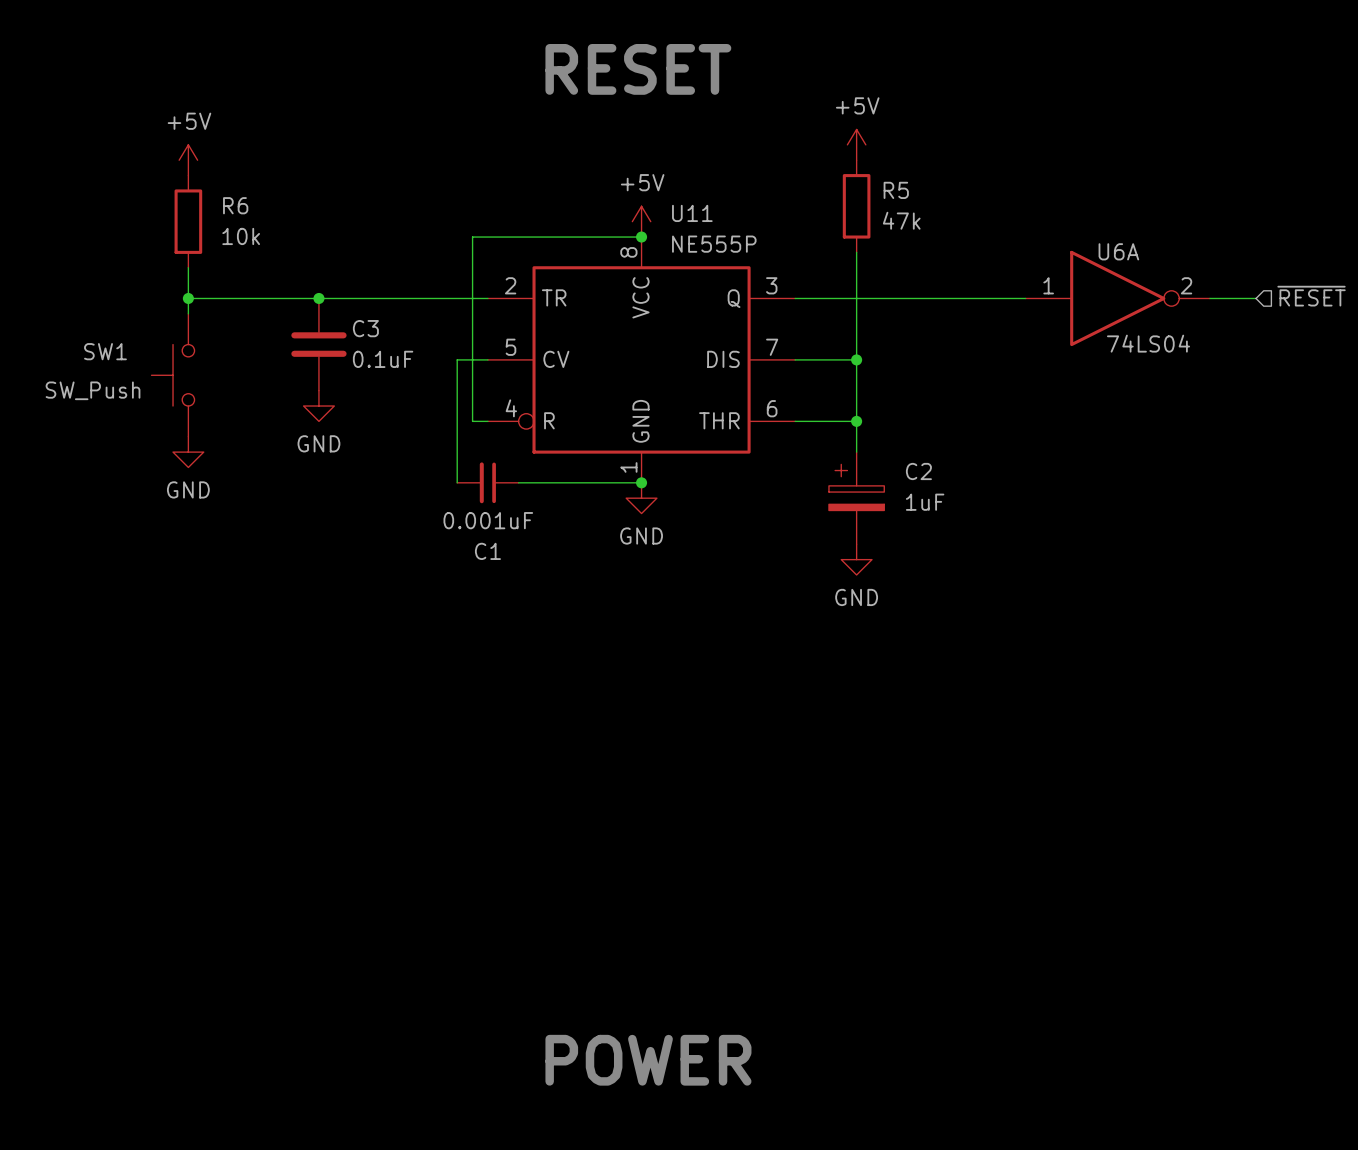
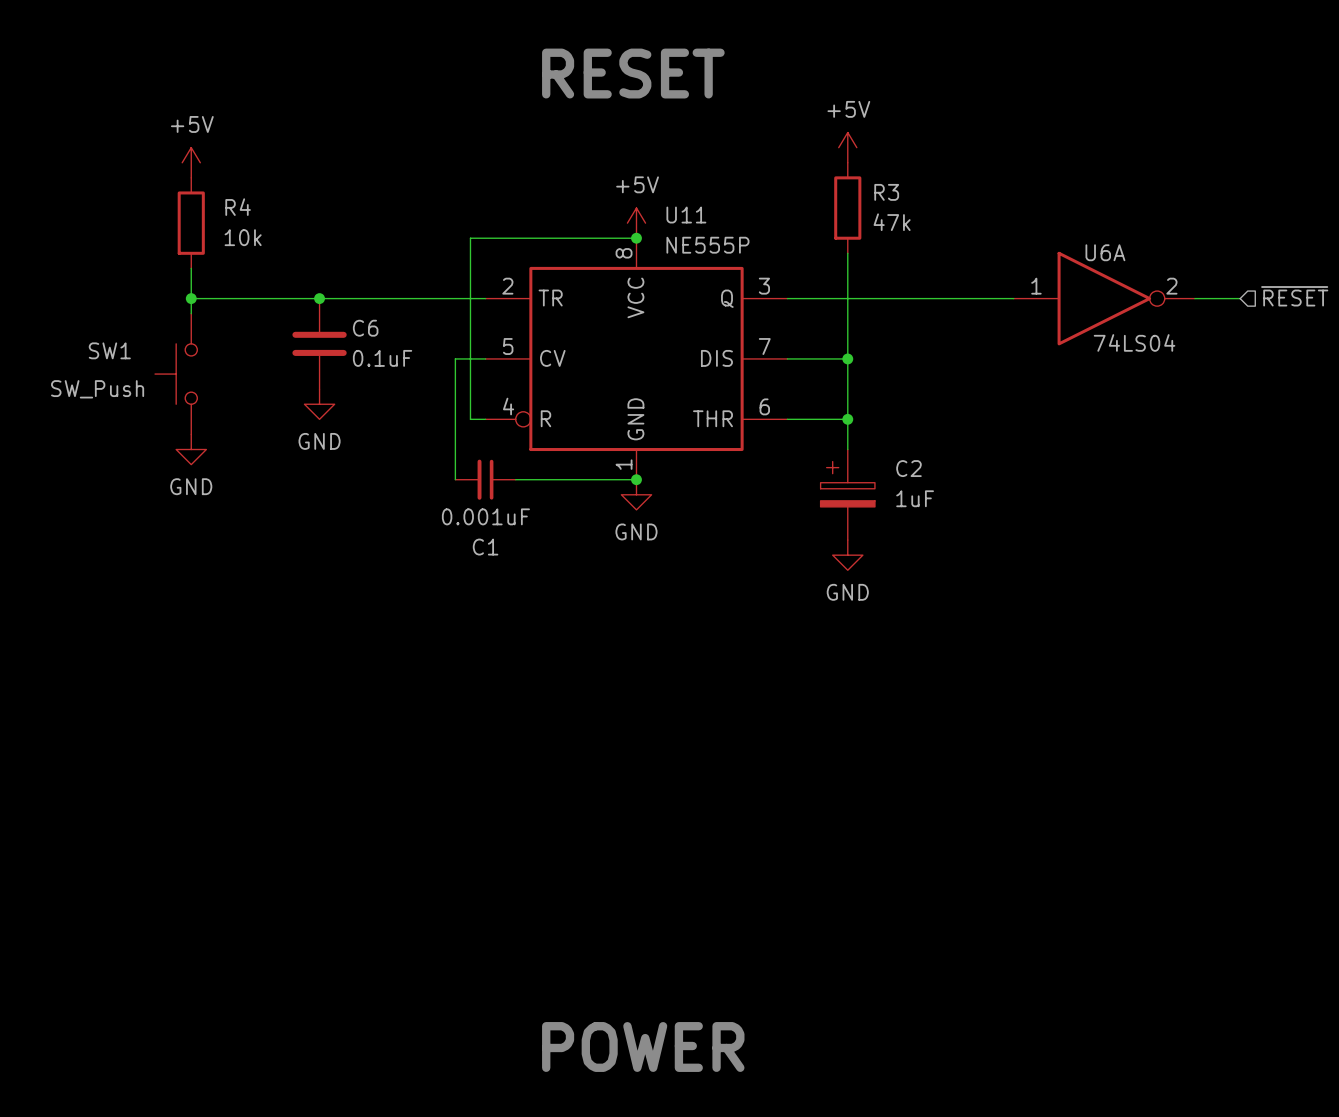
R5 name: R5 (896, 190) -> R3 (886, 192)
R6 name: R6 (235, 205) -> R4 (238, 207)
C3 name: C3 (365, 328) -> C6 (365, 328)

